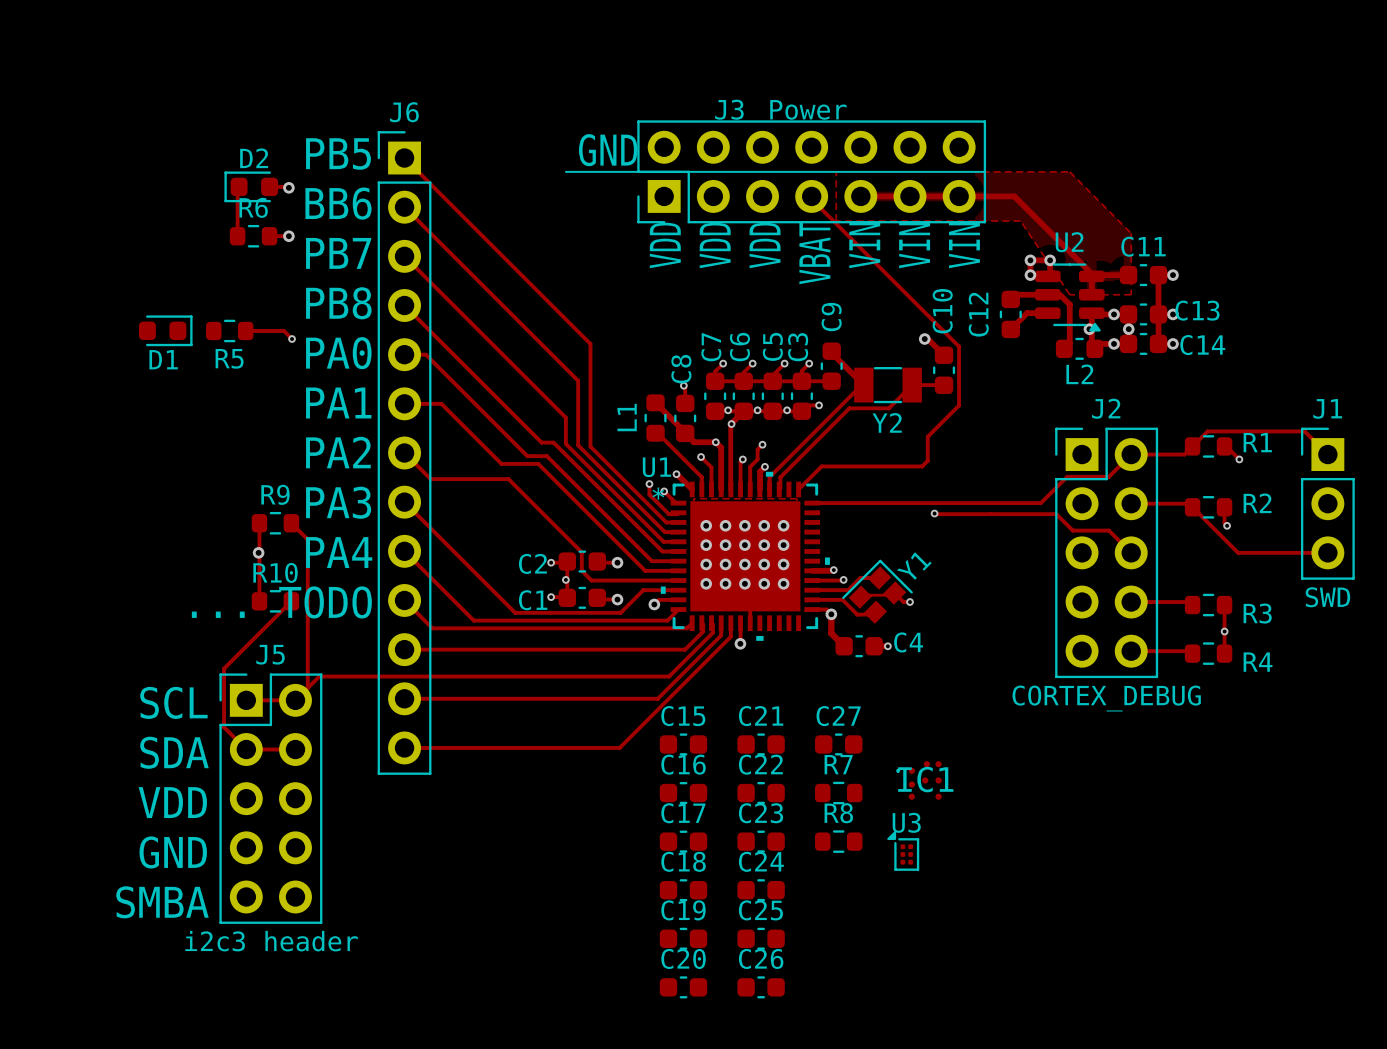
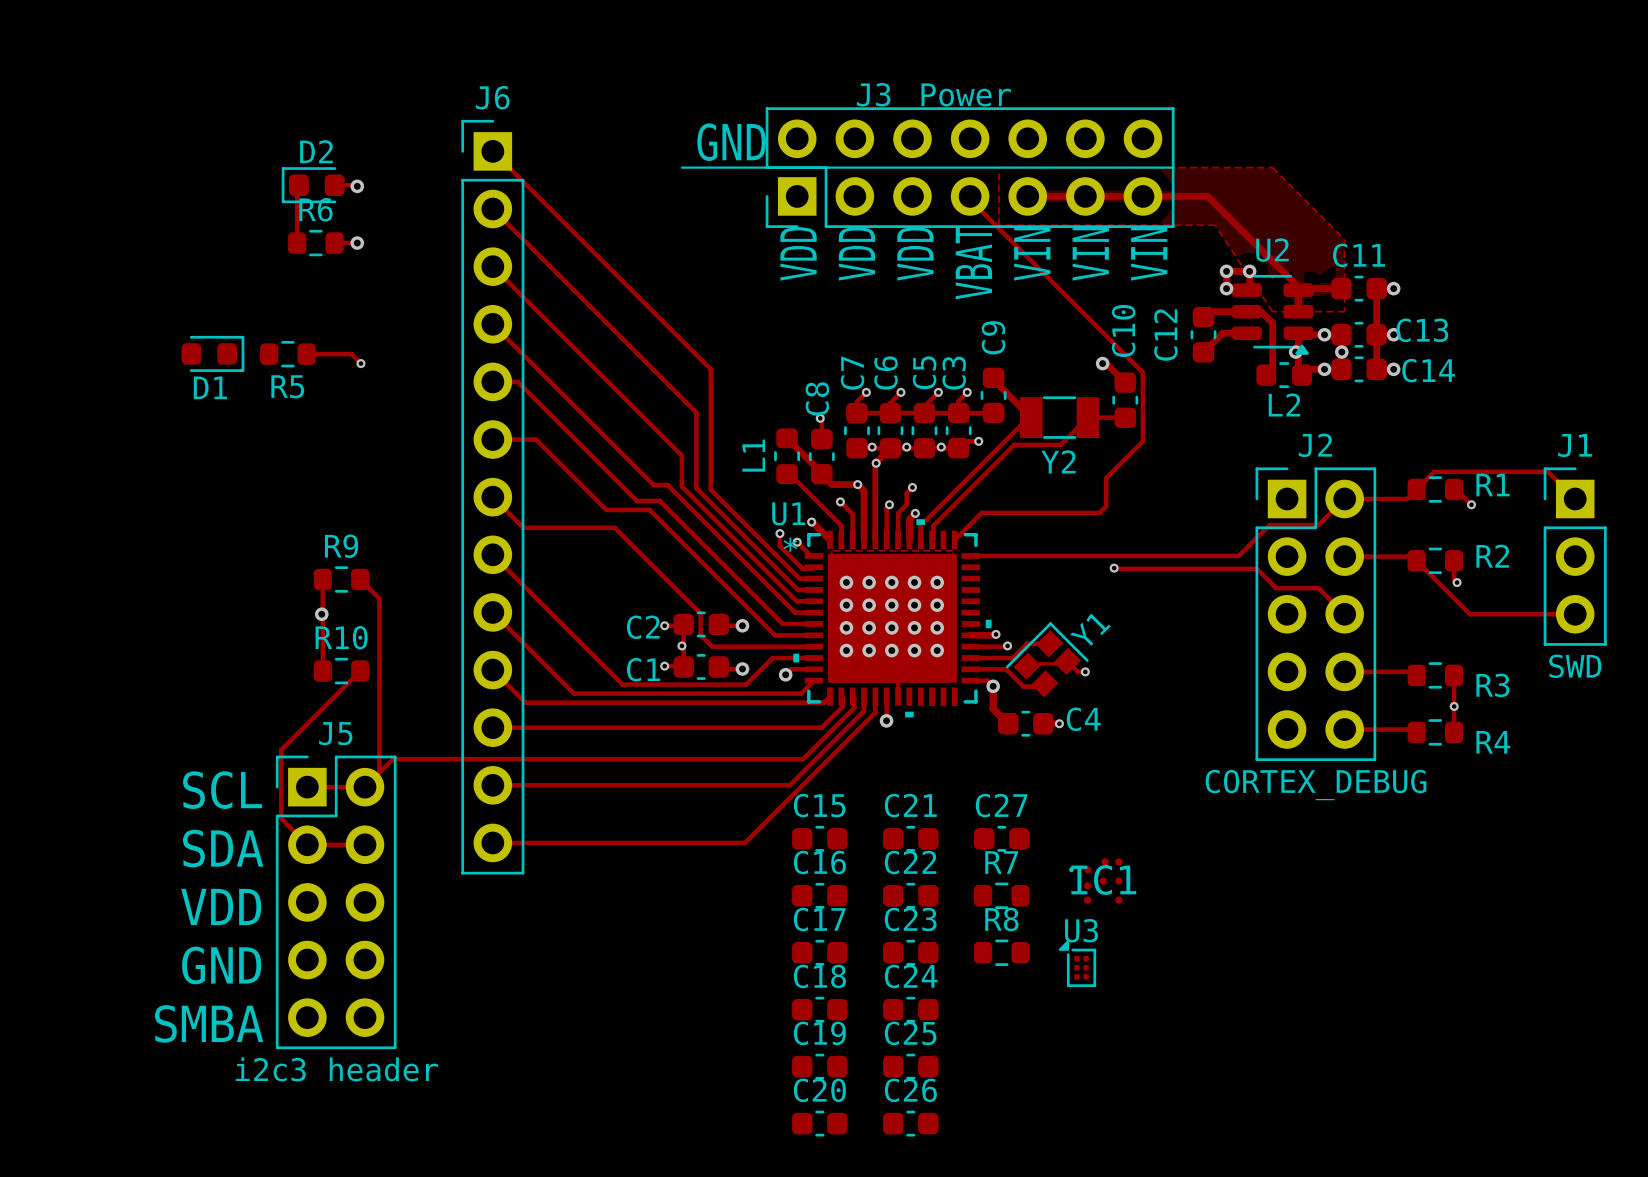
text: PB5 (338, 154) -> none
text: BB6 (338, 203) -> none
text: PB7 (338, 253) -> none
text: PB8 (338, 303) -> none
text: PA0 (338, 353) -> none
text: PA1 (338, 402) -> none
text: PA2 (338, 452) -> none
text: PA3 (338, 502) -> none
text: PA4 (339, 552) -> none
text: ... TODO (281, 602) -> none

